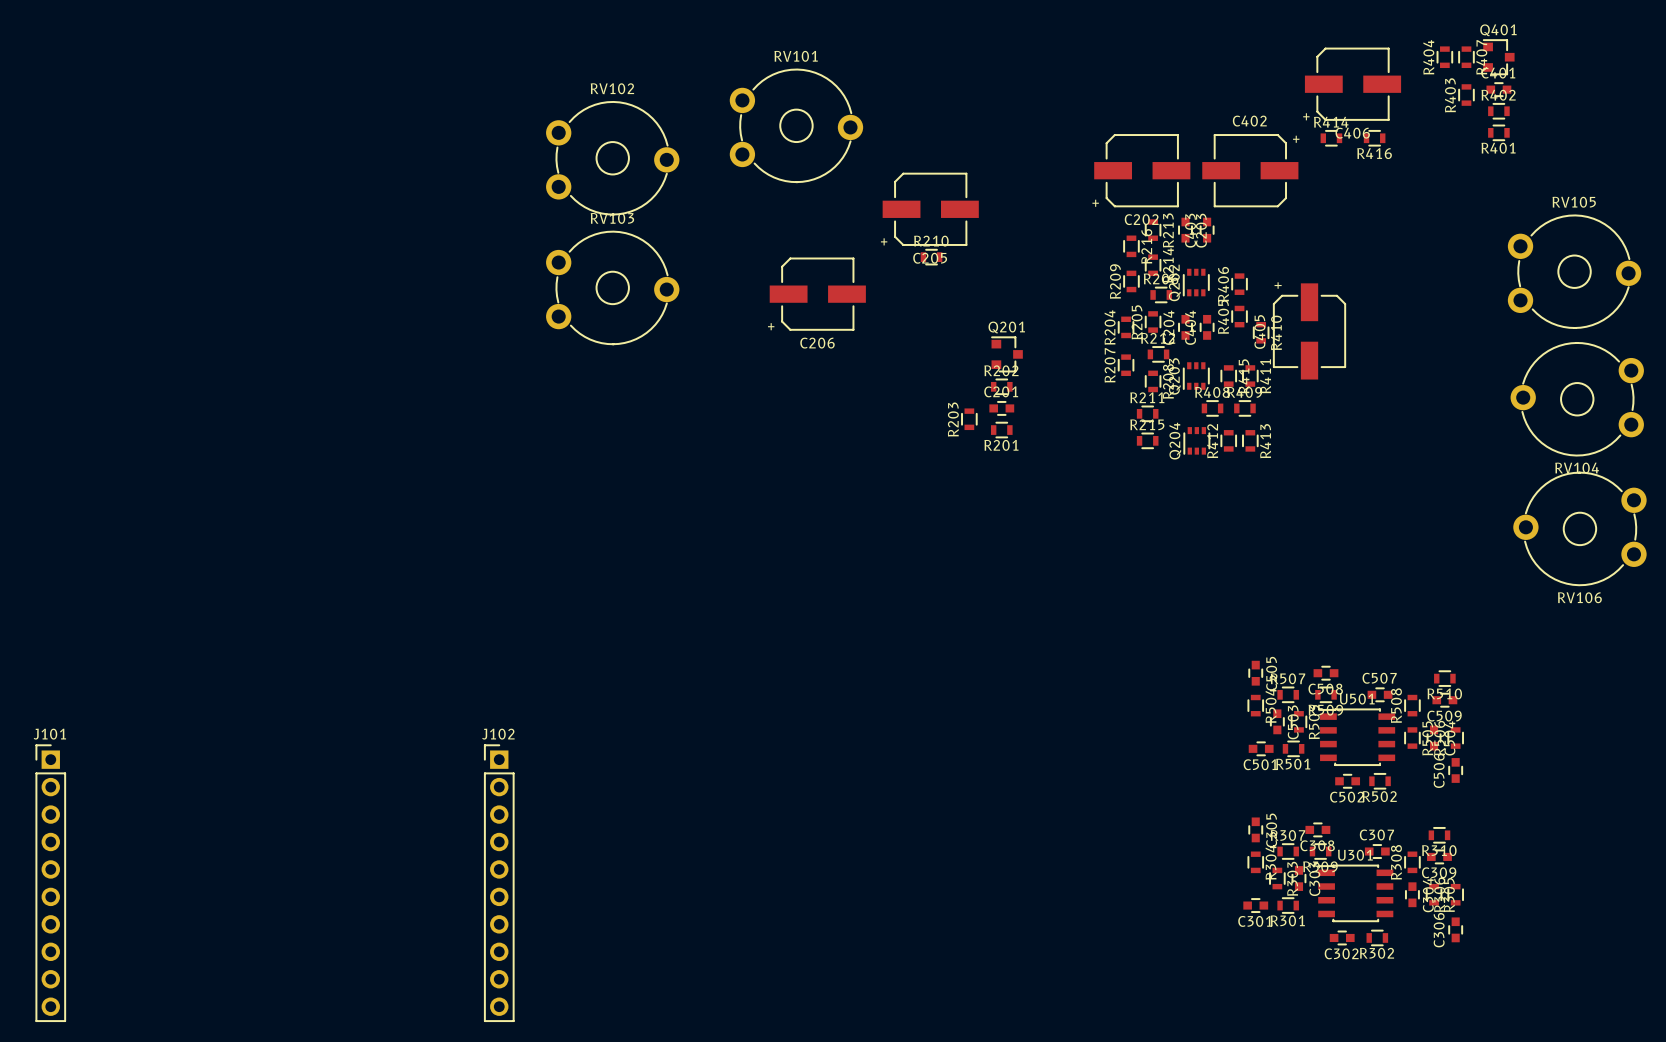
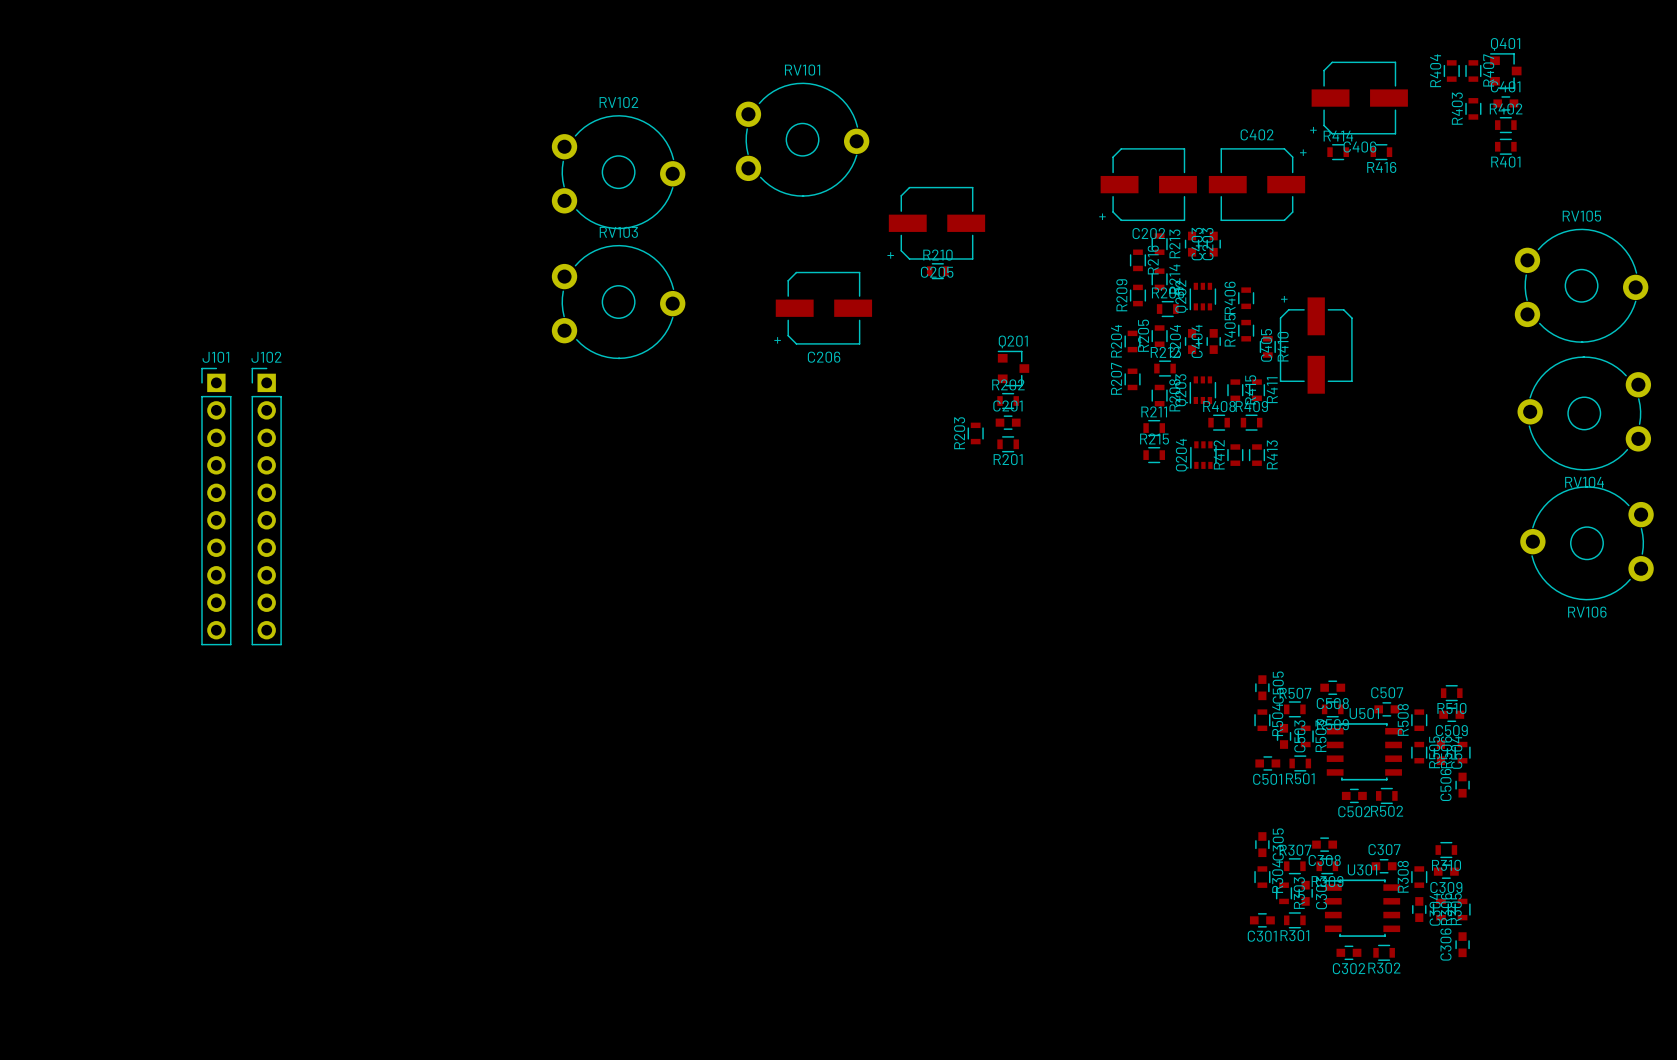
J101 position: (50, 883) -> (216, 506)
J102 position: (499, 883) -> (266, 506)

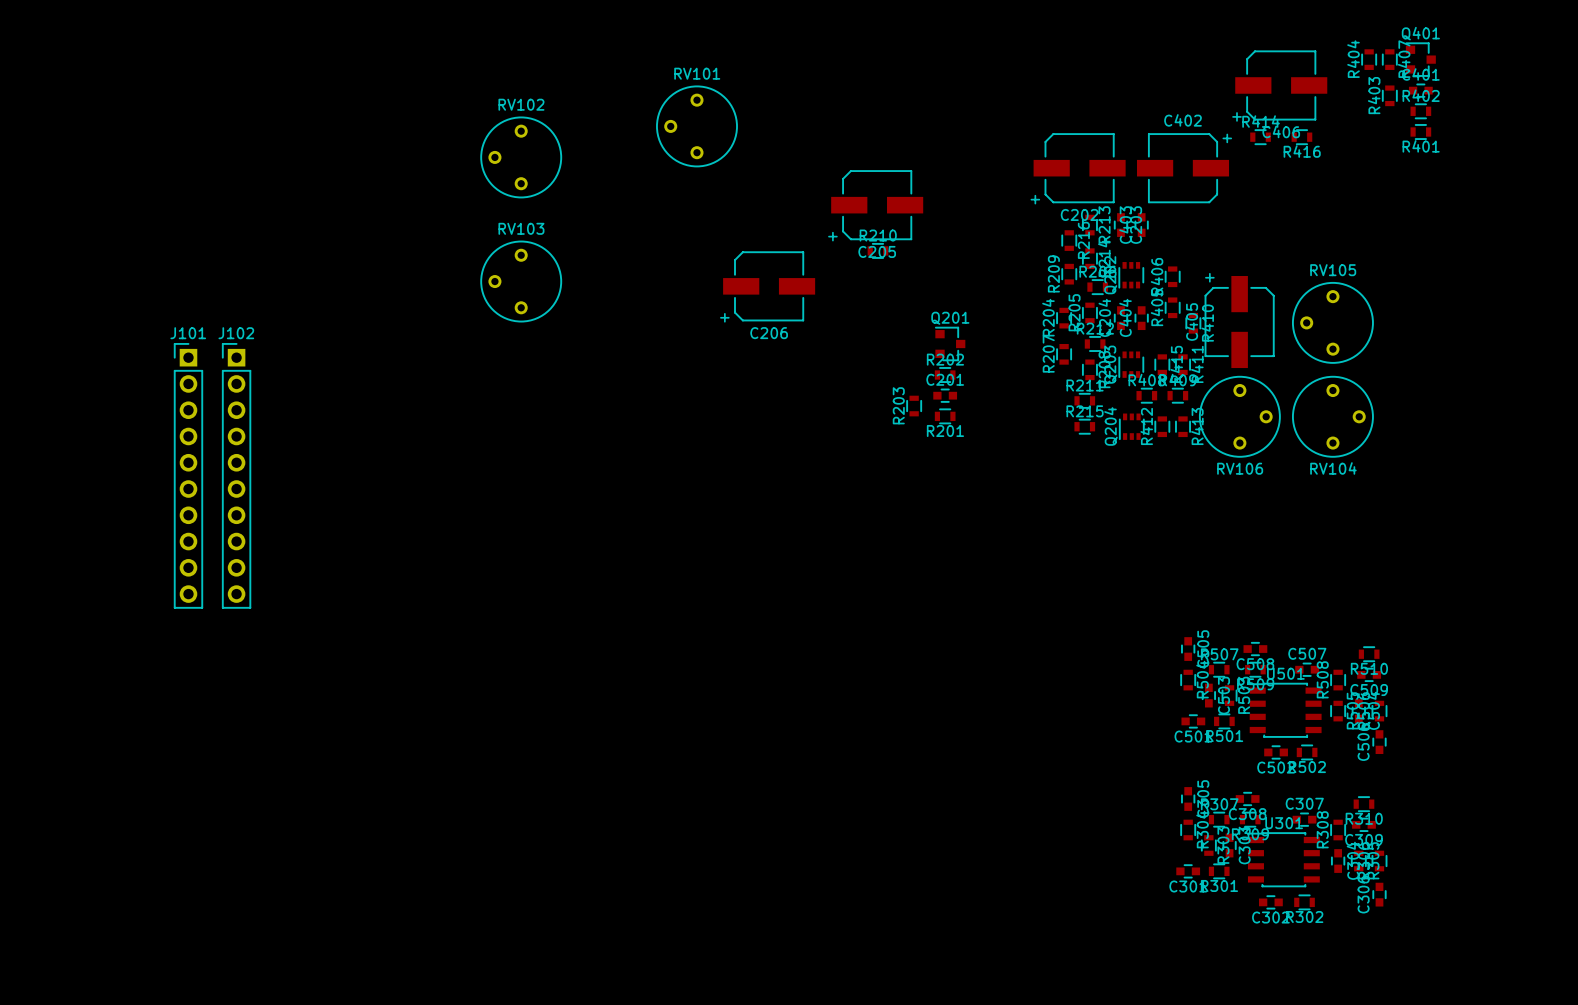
RV101 footprint: [735, 82, 870, 197] -> [656, 85, 738, 168]
RV102 footprint: [551, 115, 686, 230] -> [480, 116, 562, 199]
RV105 footprint: [1514, 228, 1649, 343] -> [1292, 282, 1374, 364]
RV103 footprint: [551, 244, 686, 360] -> [480, 240, 562, 323]
RV104 footprint: [1517, 356, 1652, 471] -> [1292, 376, 1374, 458]
RV106 footprint: [1520, 486, 1654, 601] -> [1199, 376, 1281, 458]

